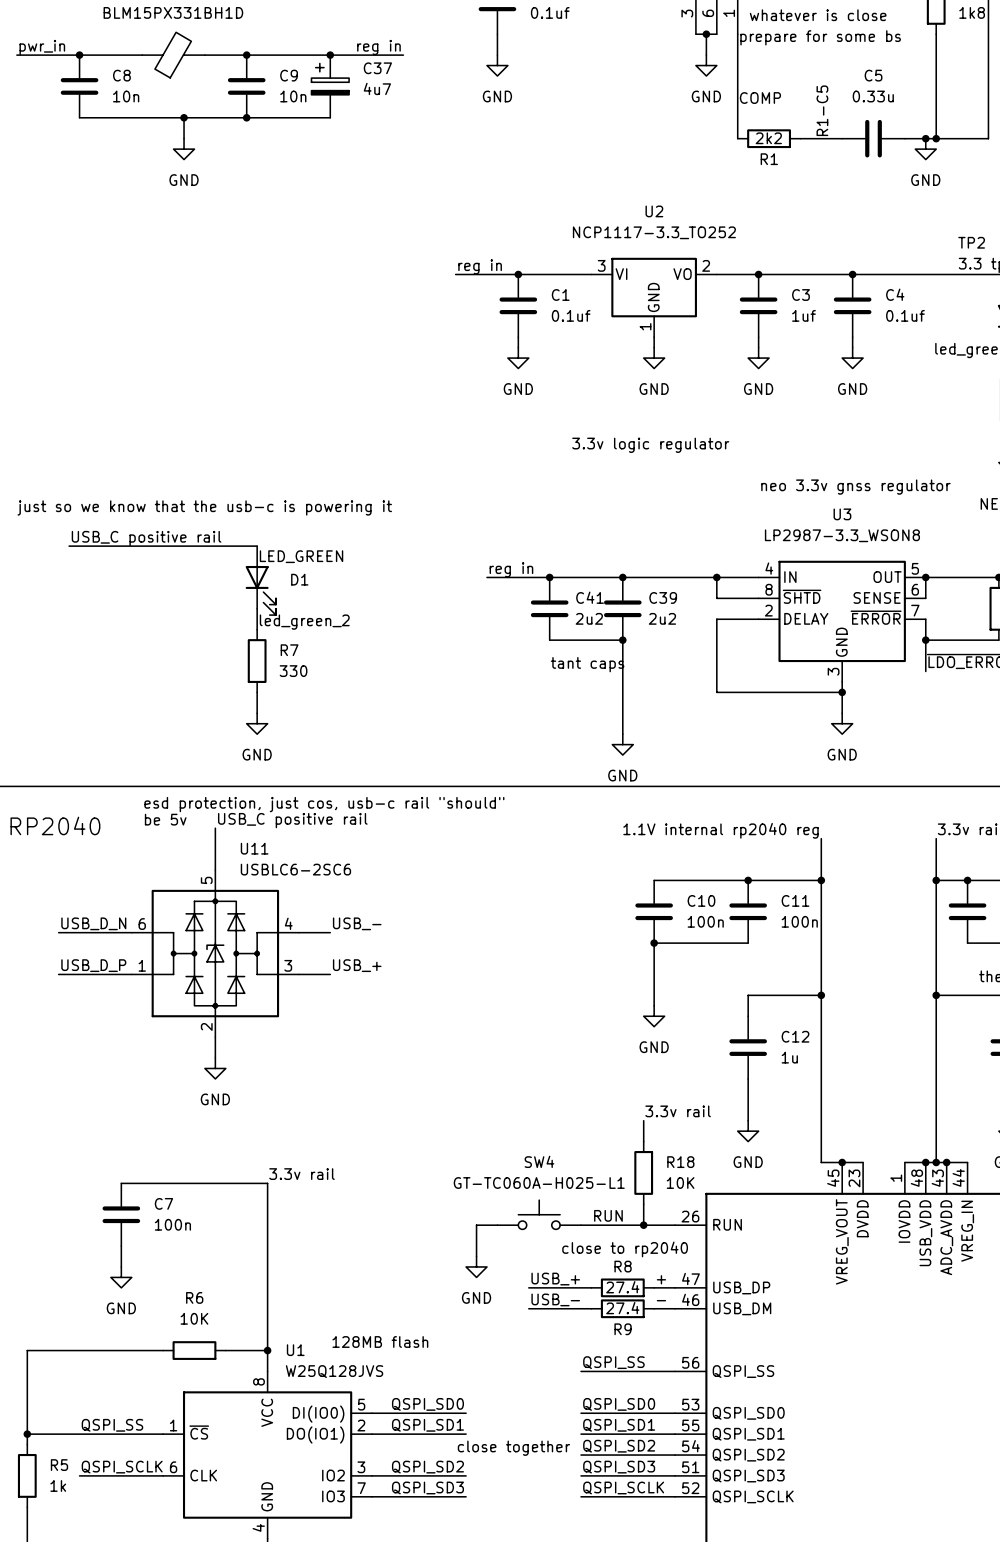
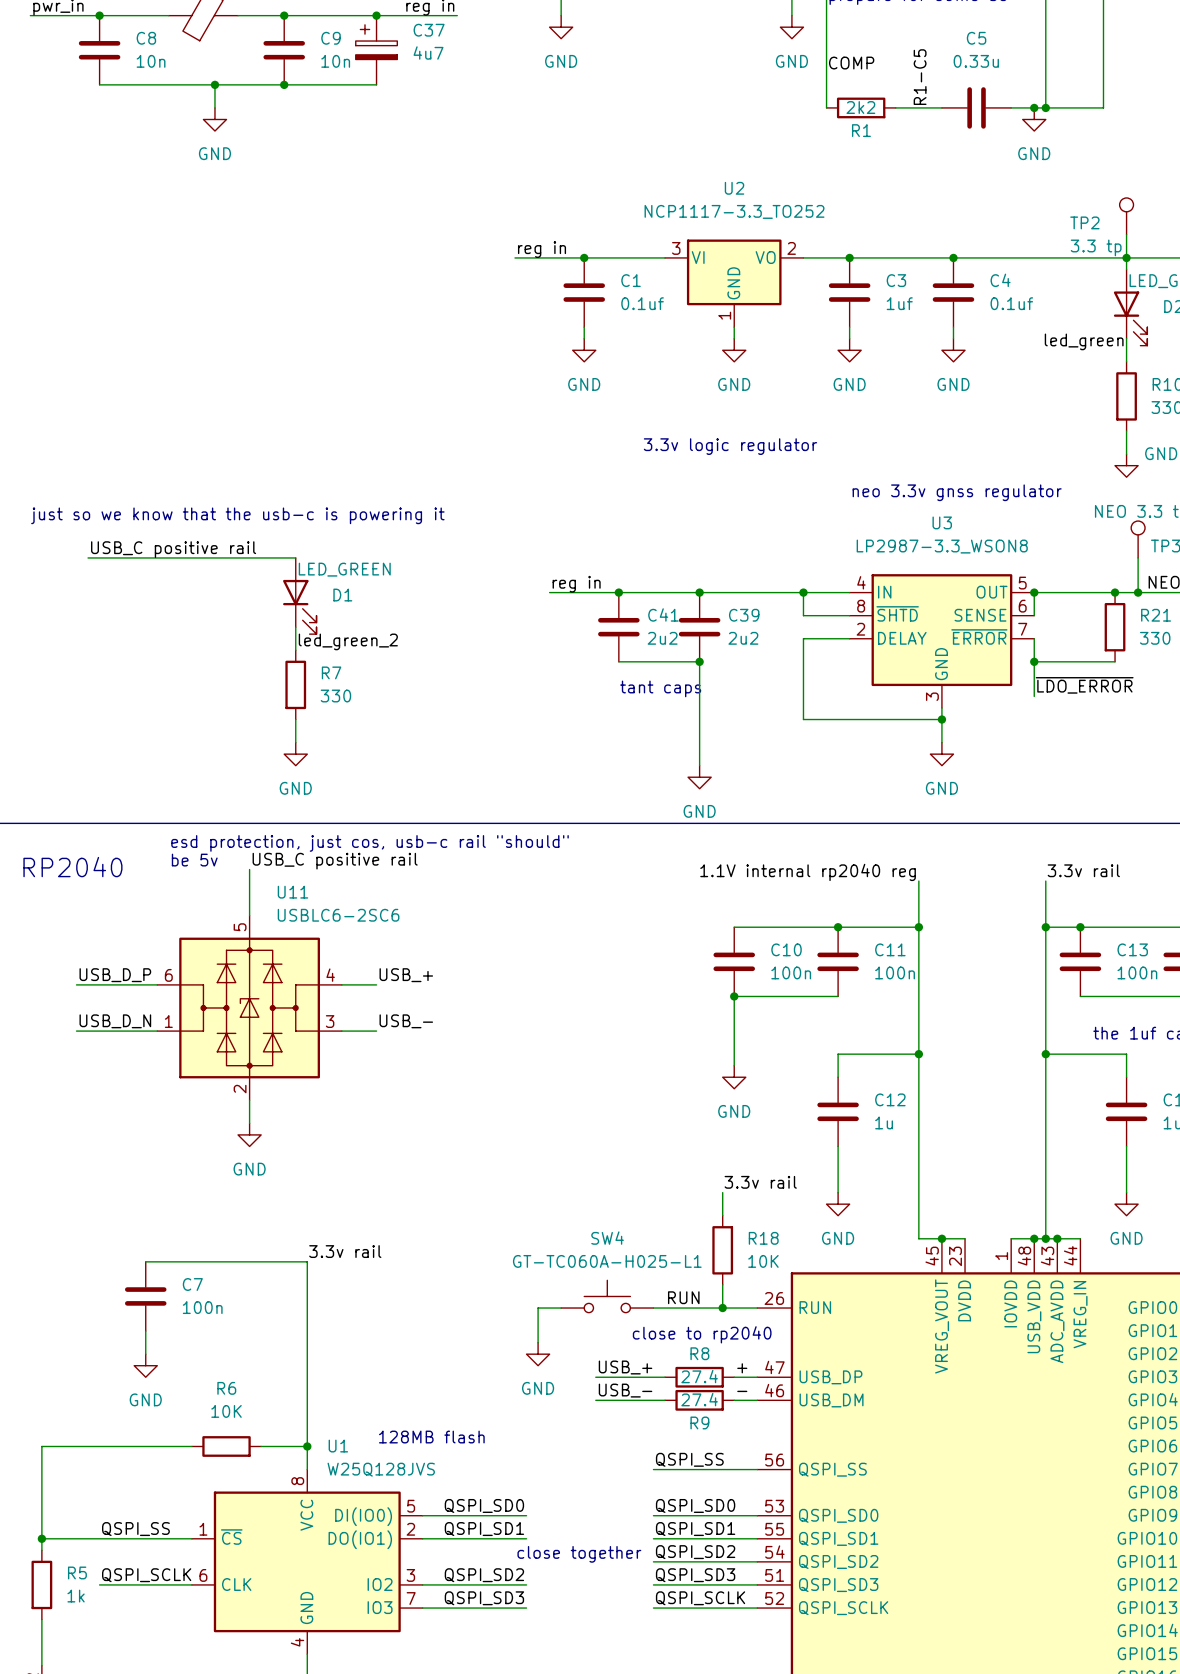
label: USB_D_N (93, 923) -> USB_D_P (115, 975)
label: USB_- (357, 923) -> USB_+ (406, 975)
label: USB_D_P (93, 965) -> USB_D_N (115, 1021)
label: USB_+ (357, 965) -> USB_- (406, 1021)

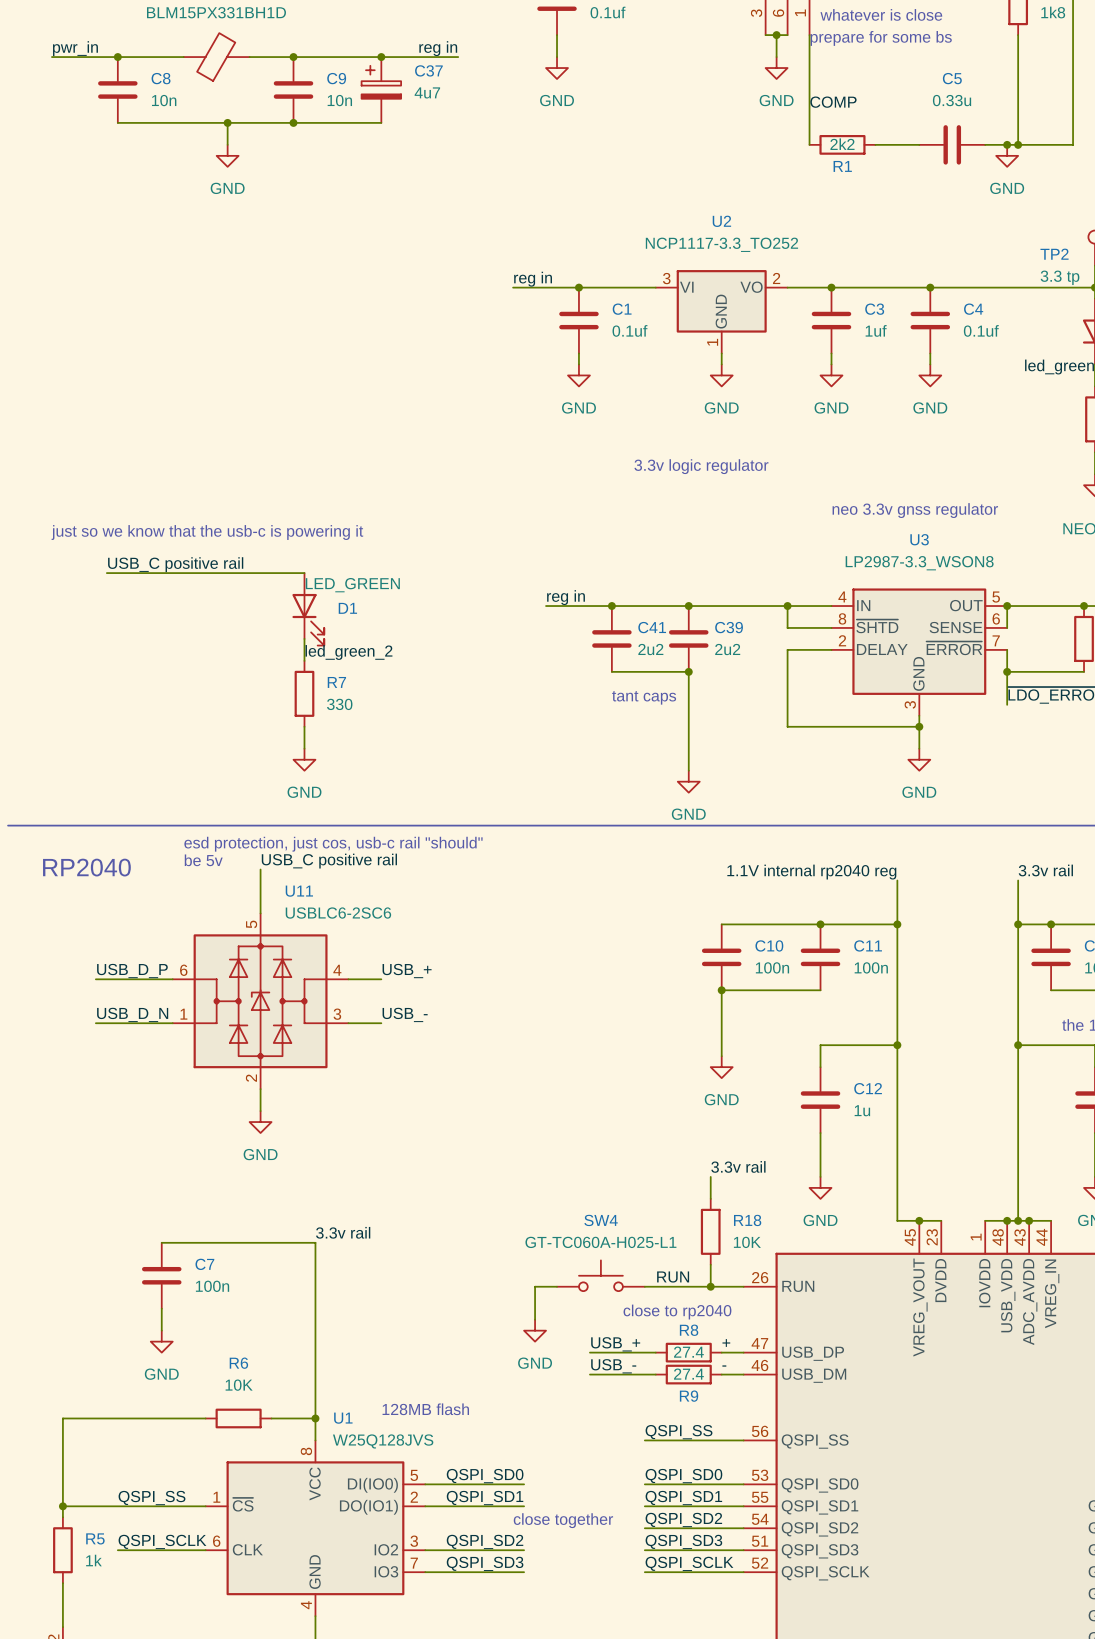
label: R1-C5 (920, 77) -> none

